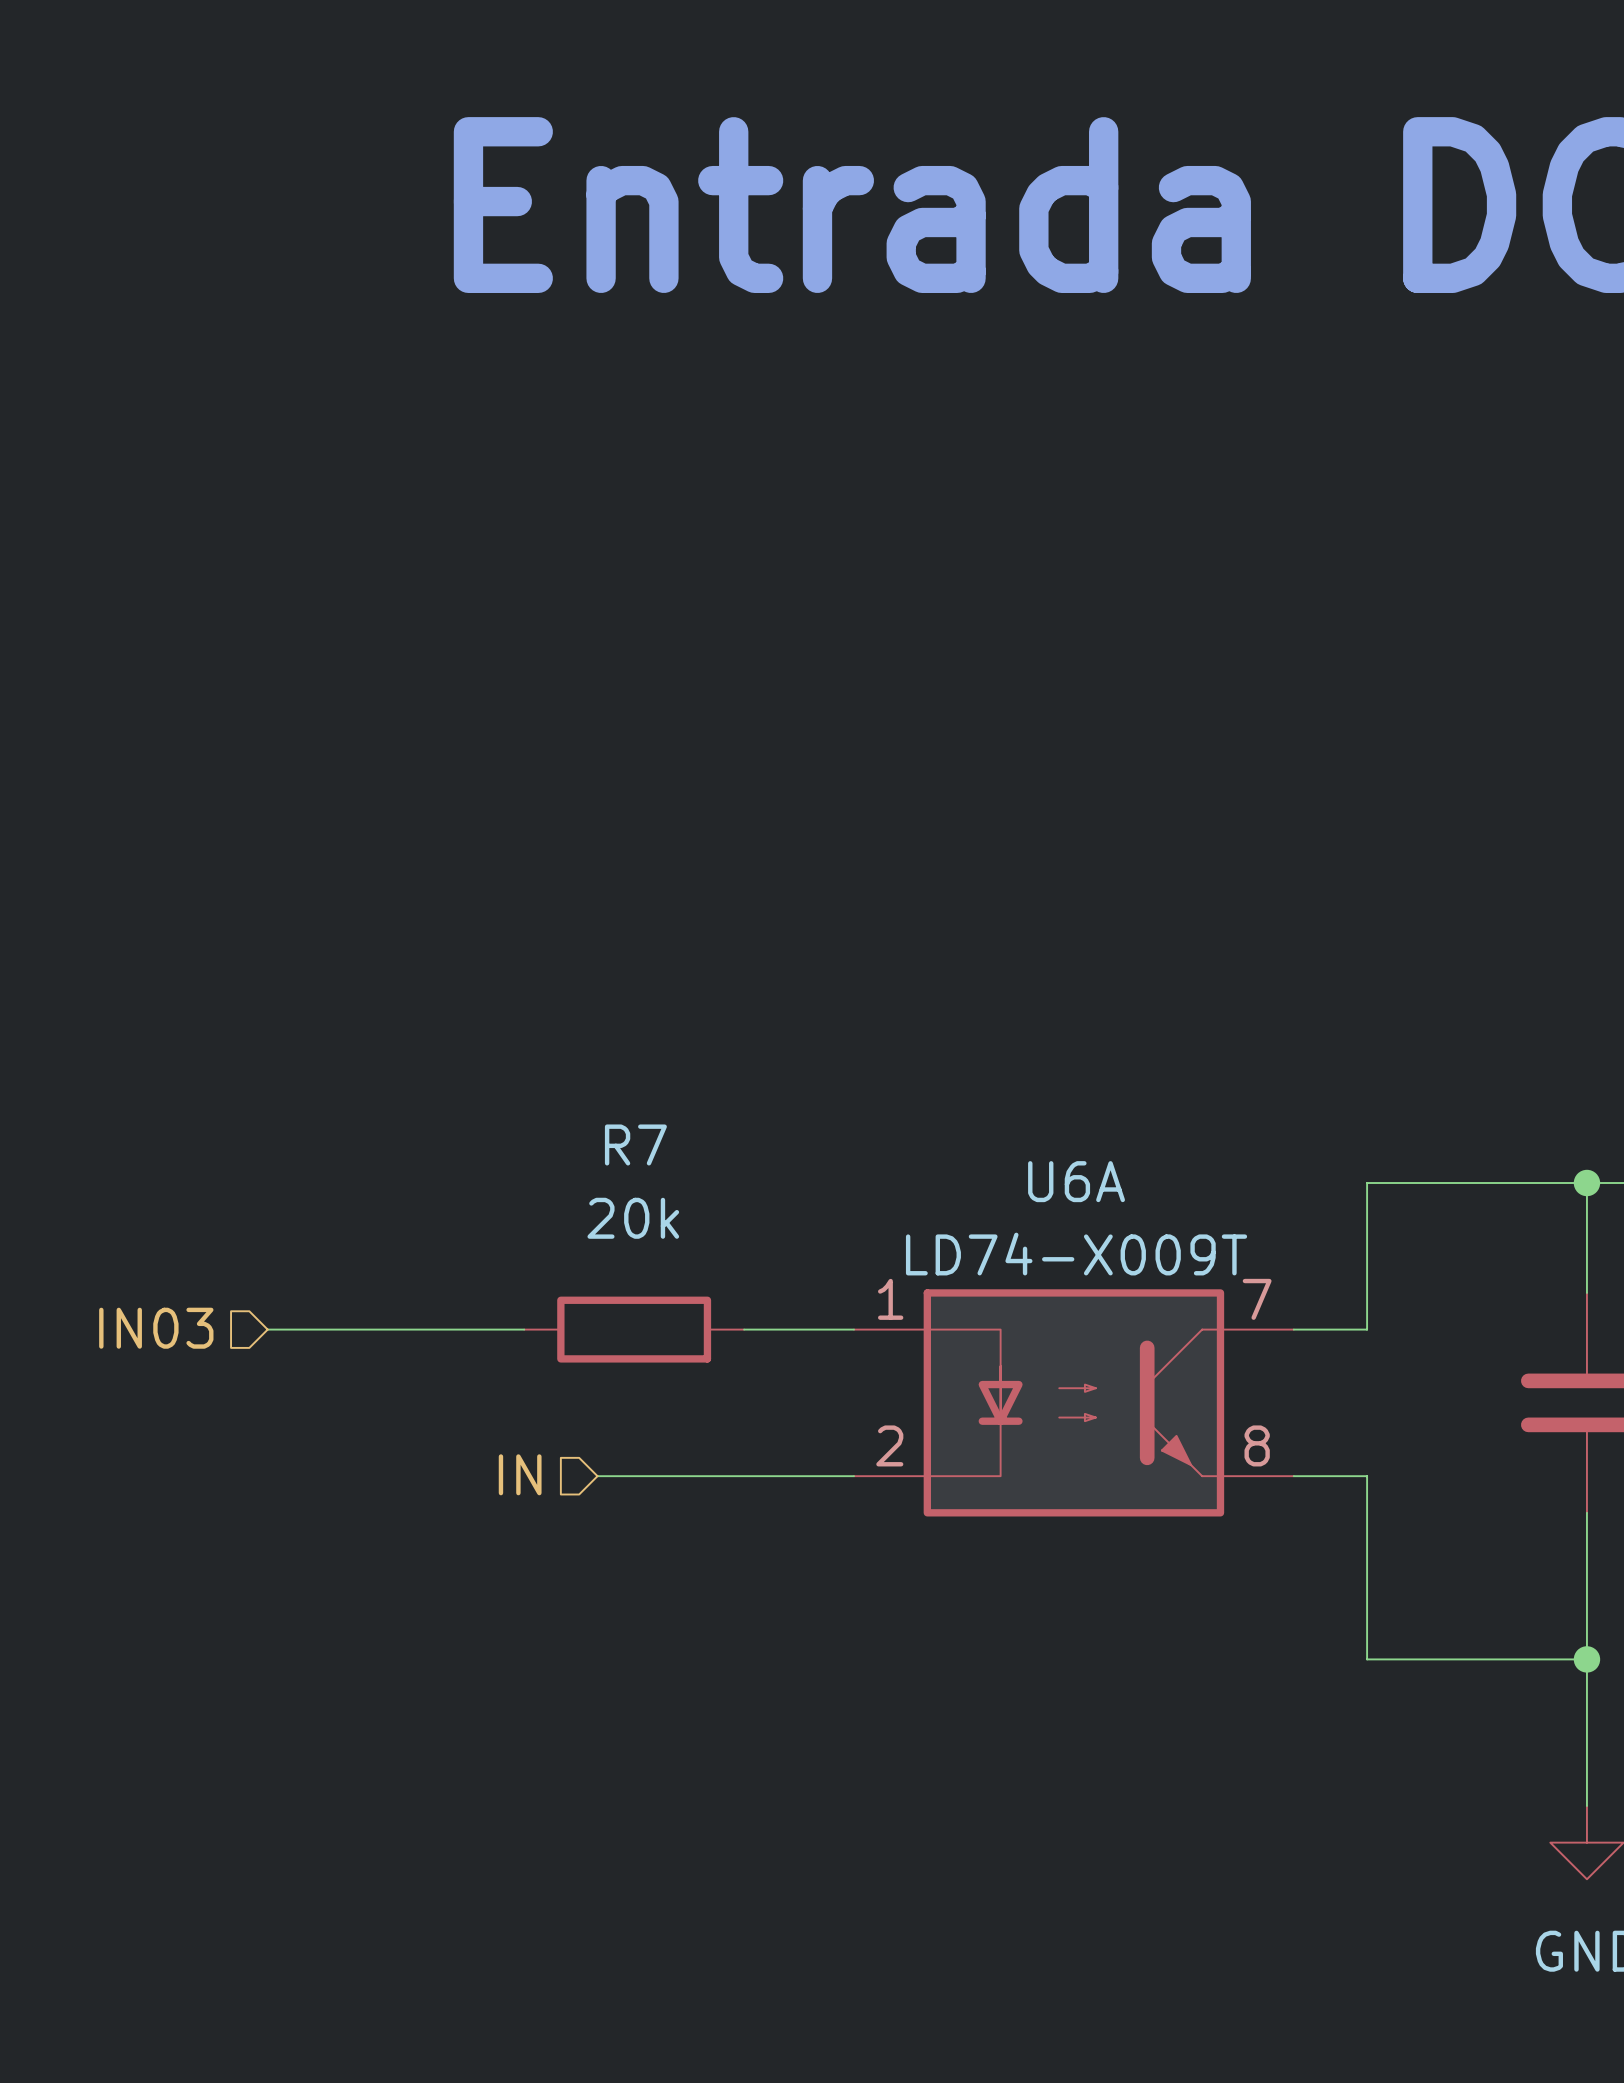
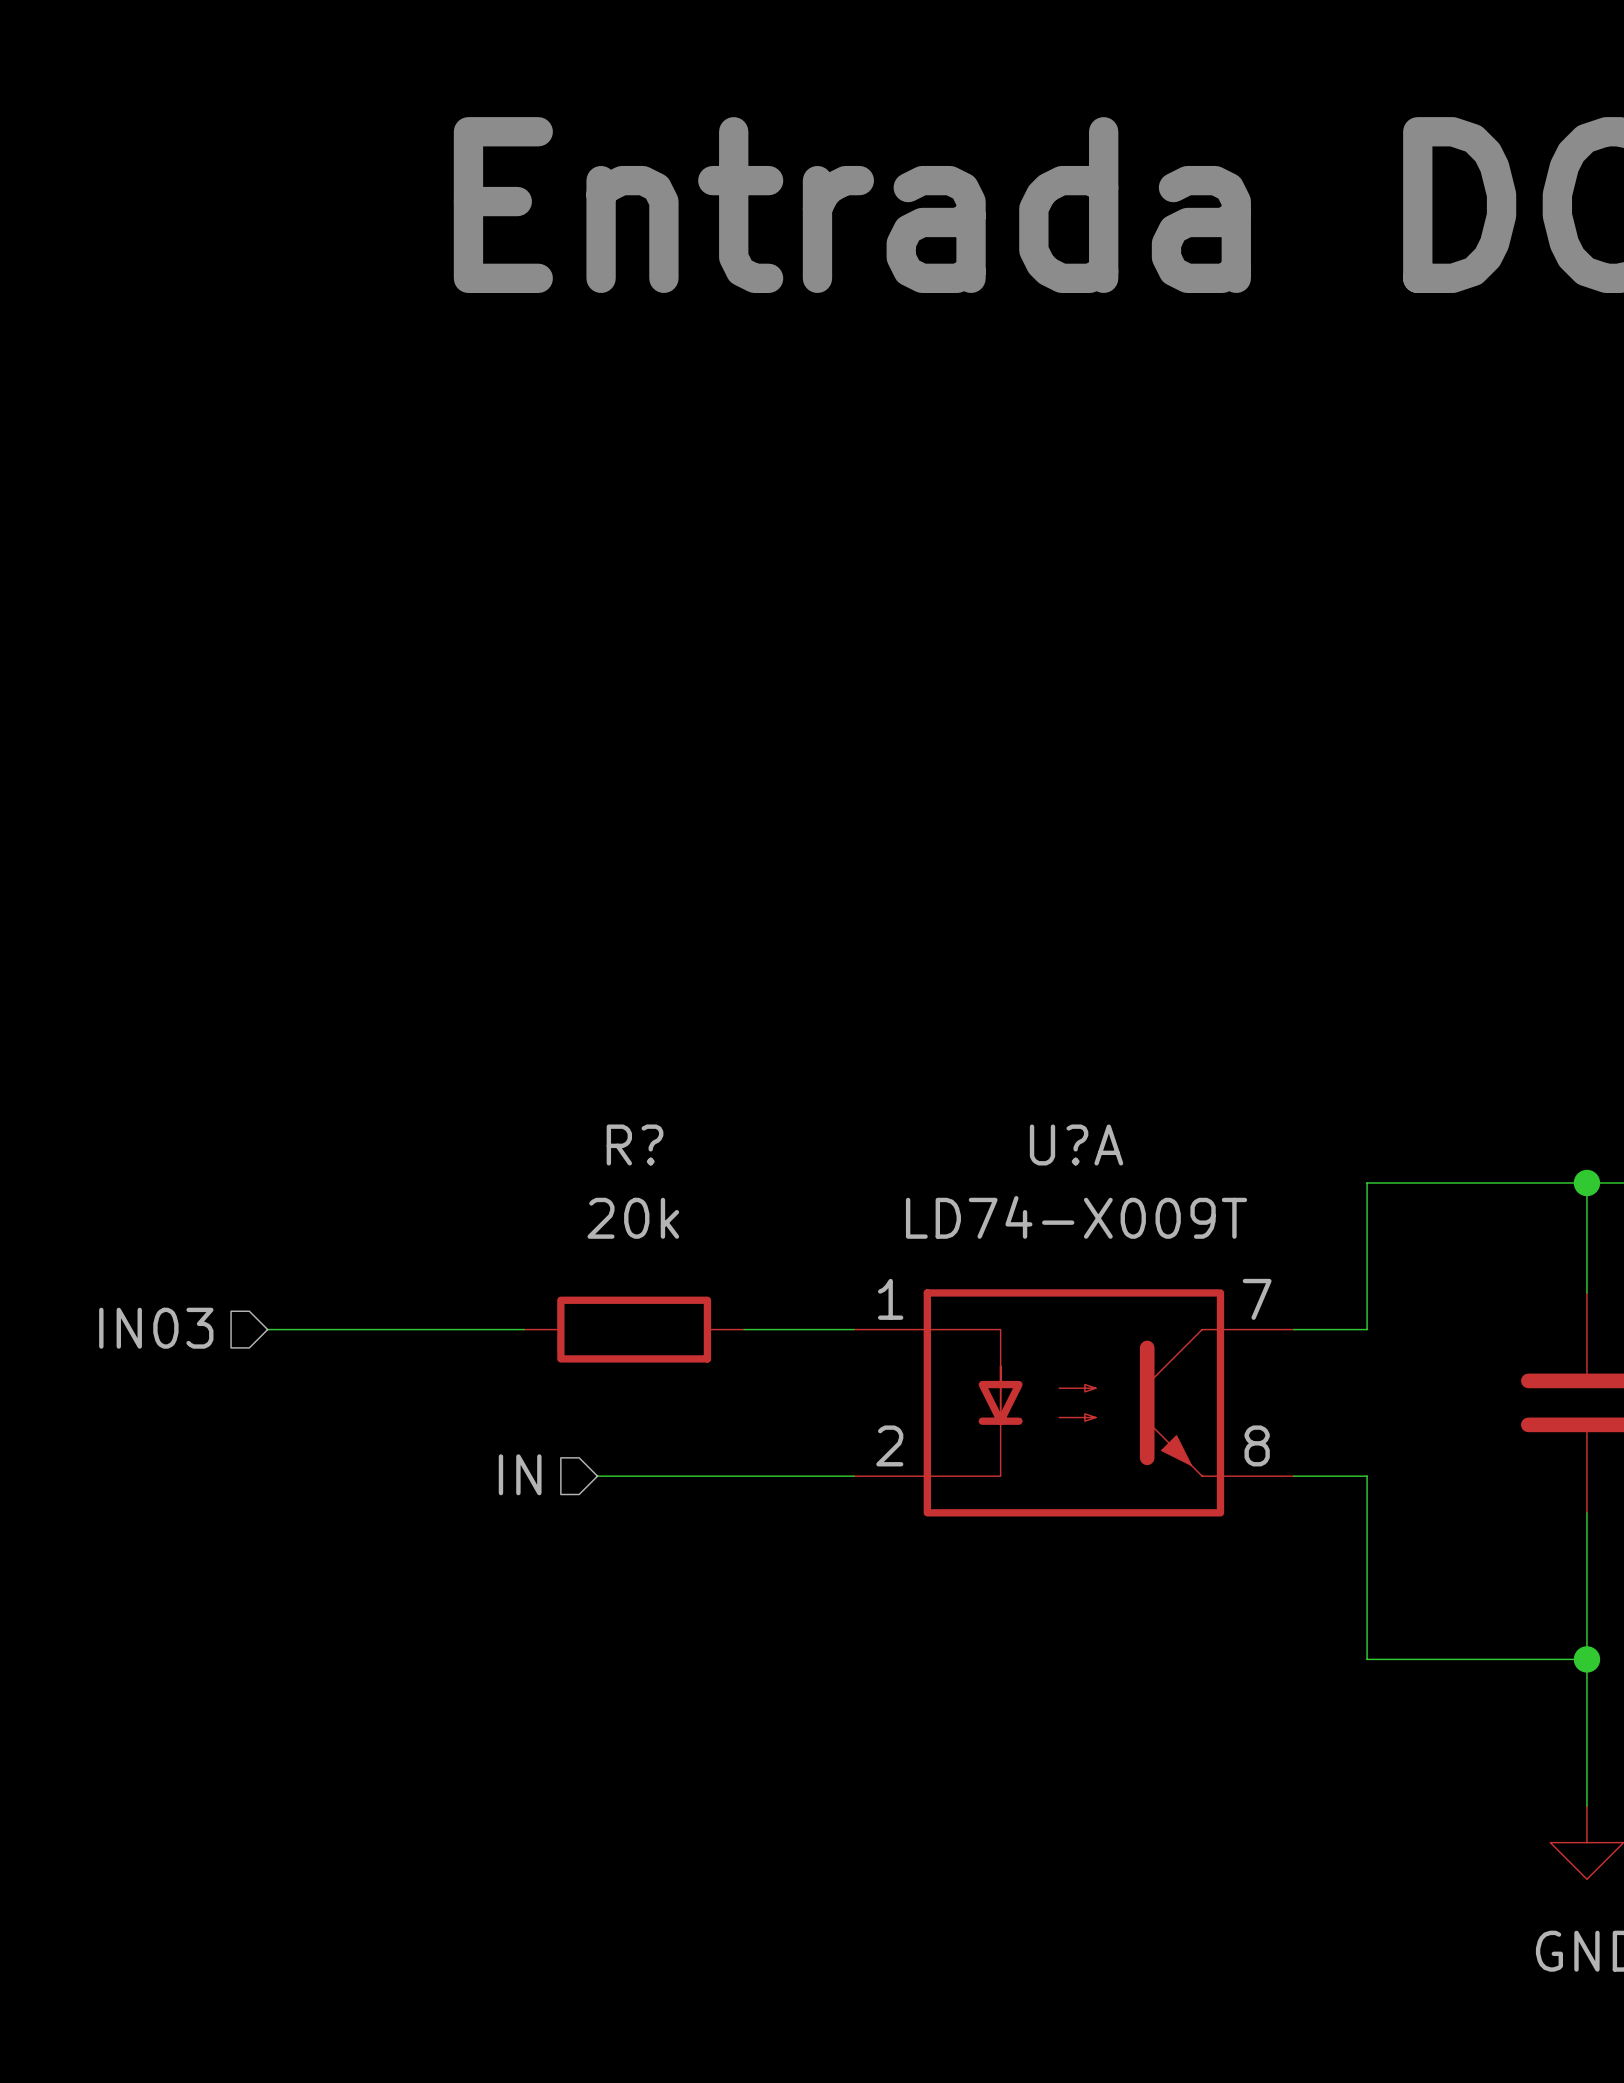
R7 name: R7 (635, 1144) -> R? (635, 1144)
U6A name: U6A (1076, 1181) -> U?A (1076, 1144)
U6A value position: LD74-X009T (1076, 1254) -> LD74-X009T (1076, 1217)

